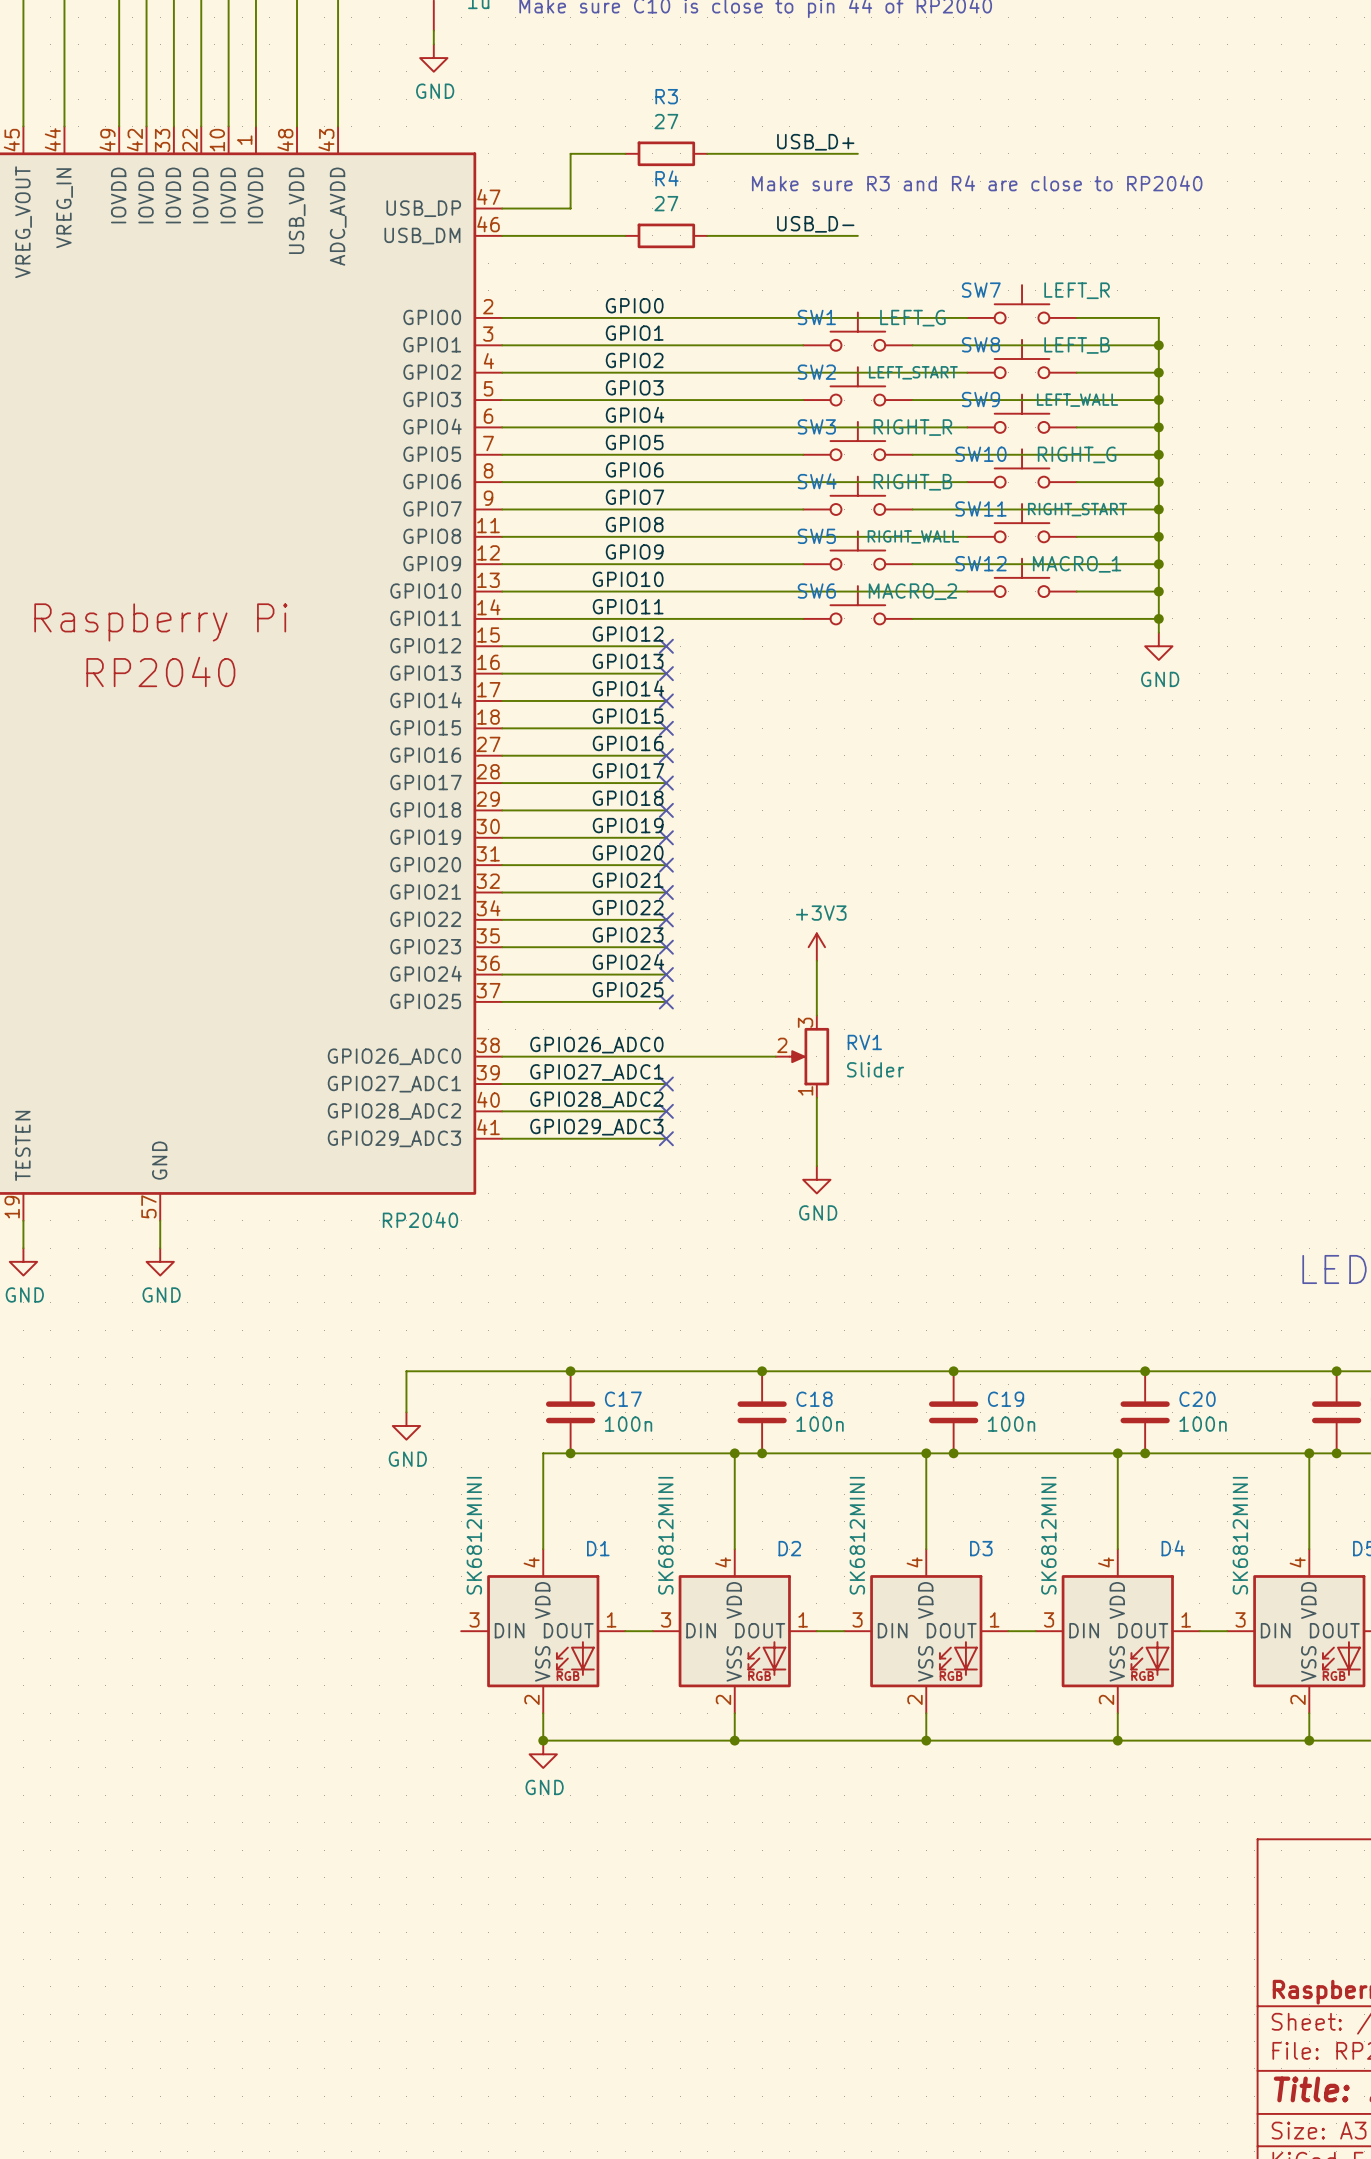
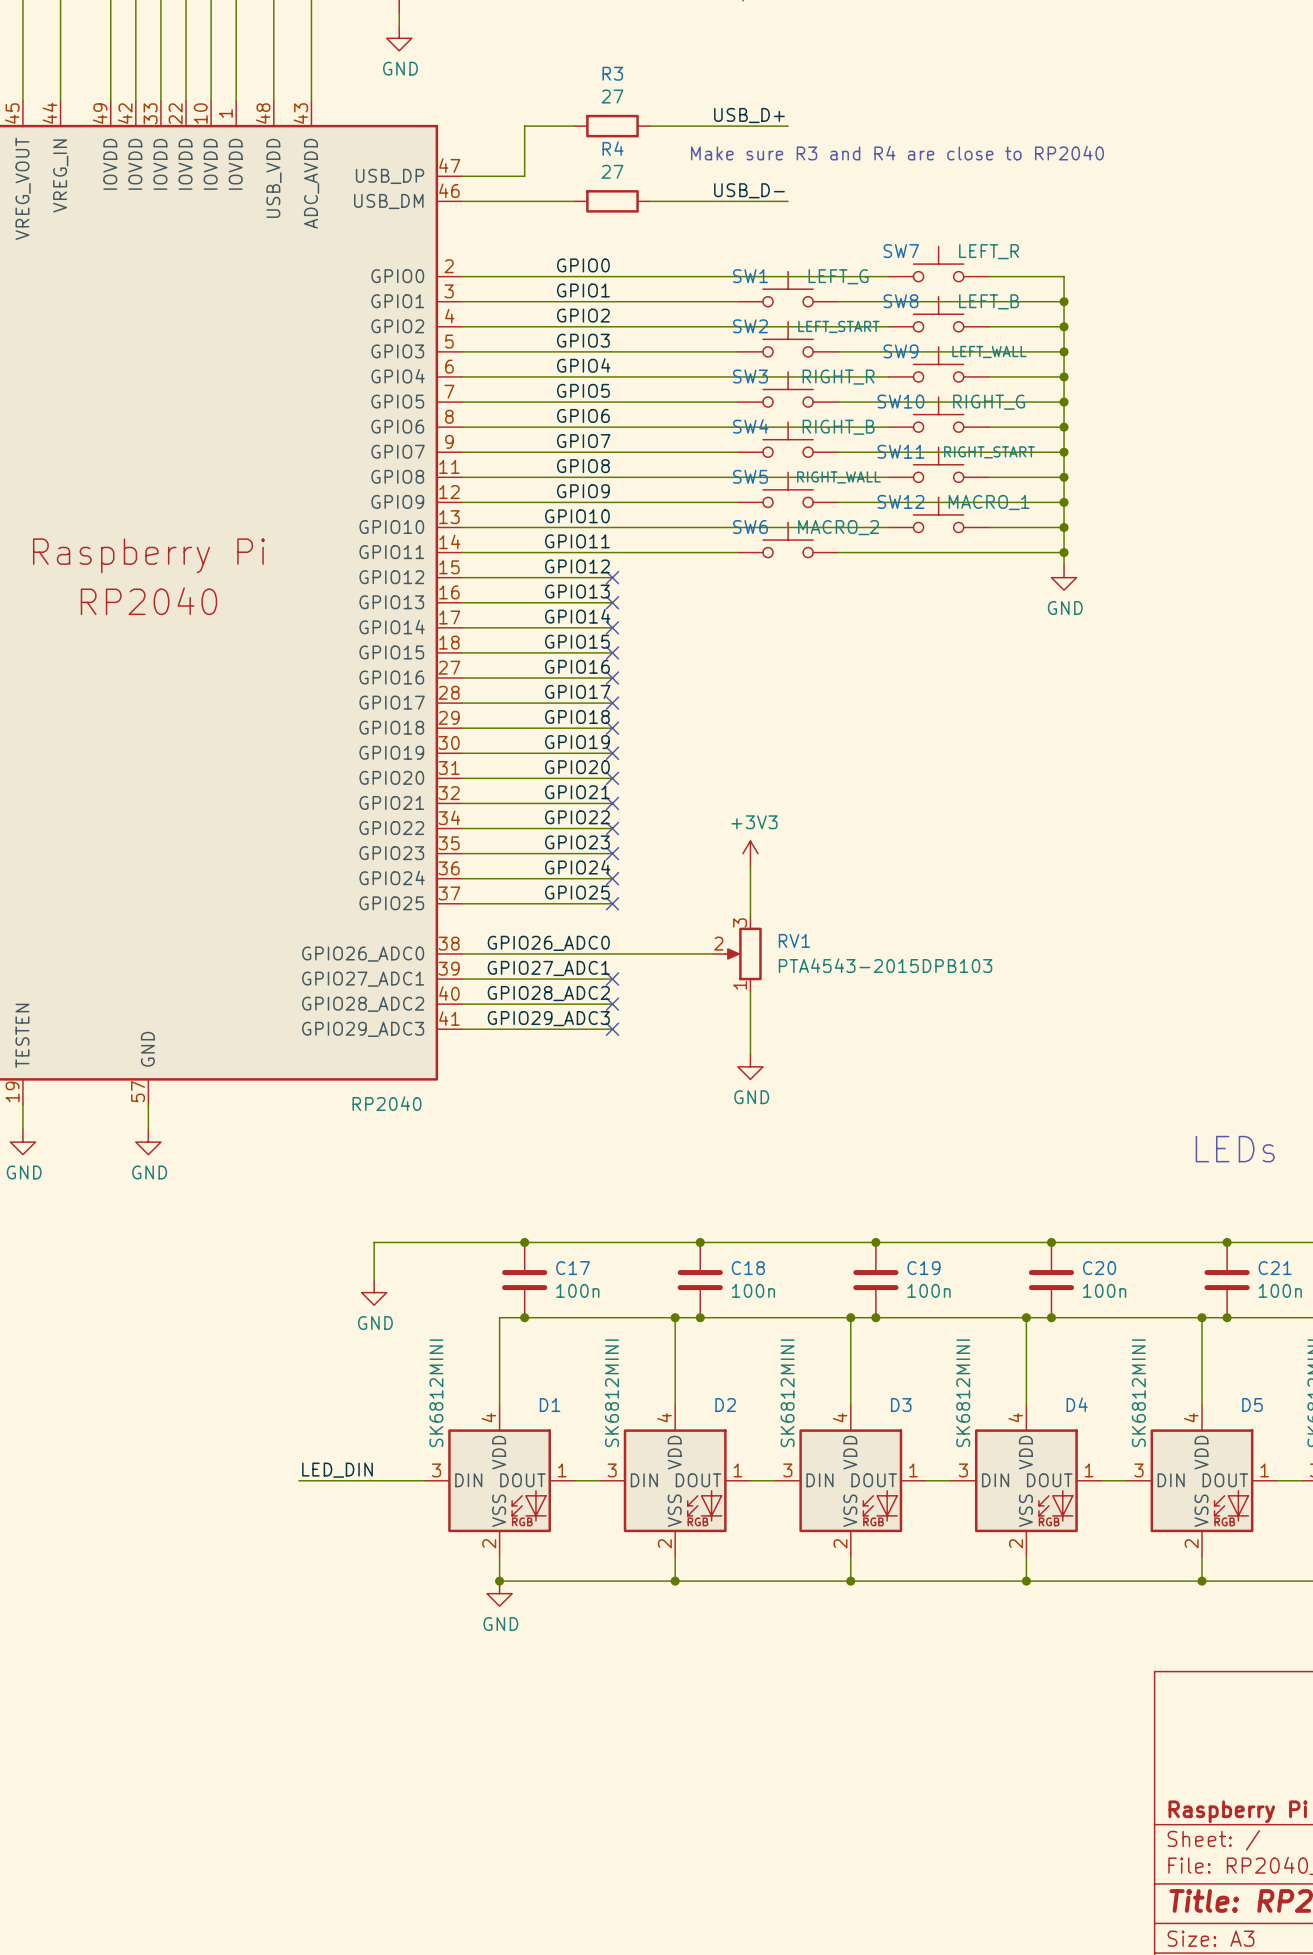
RV1 value: Slider (875, 1069) -> PTA4543-2015DPB103 (885, 965)
label: none -> LED_DIN (337, 1470)
wire: none -> (298, 1480) (424, 1480)

